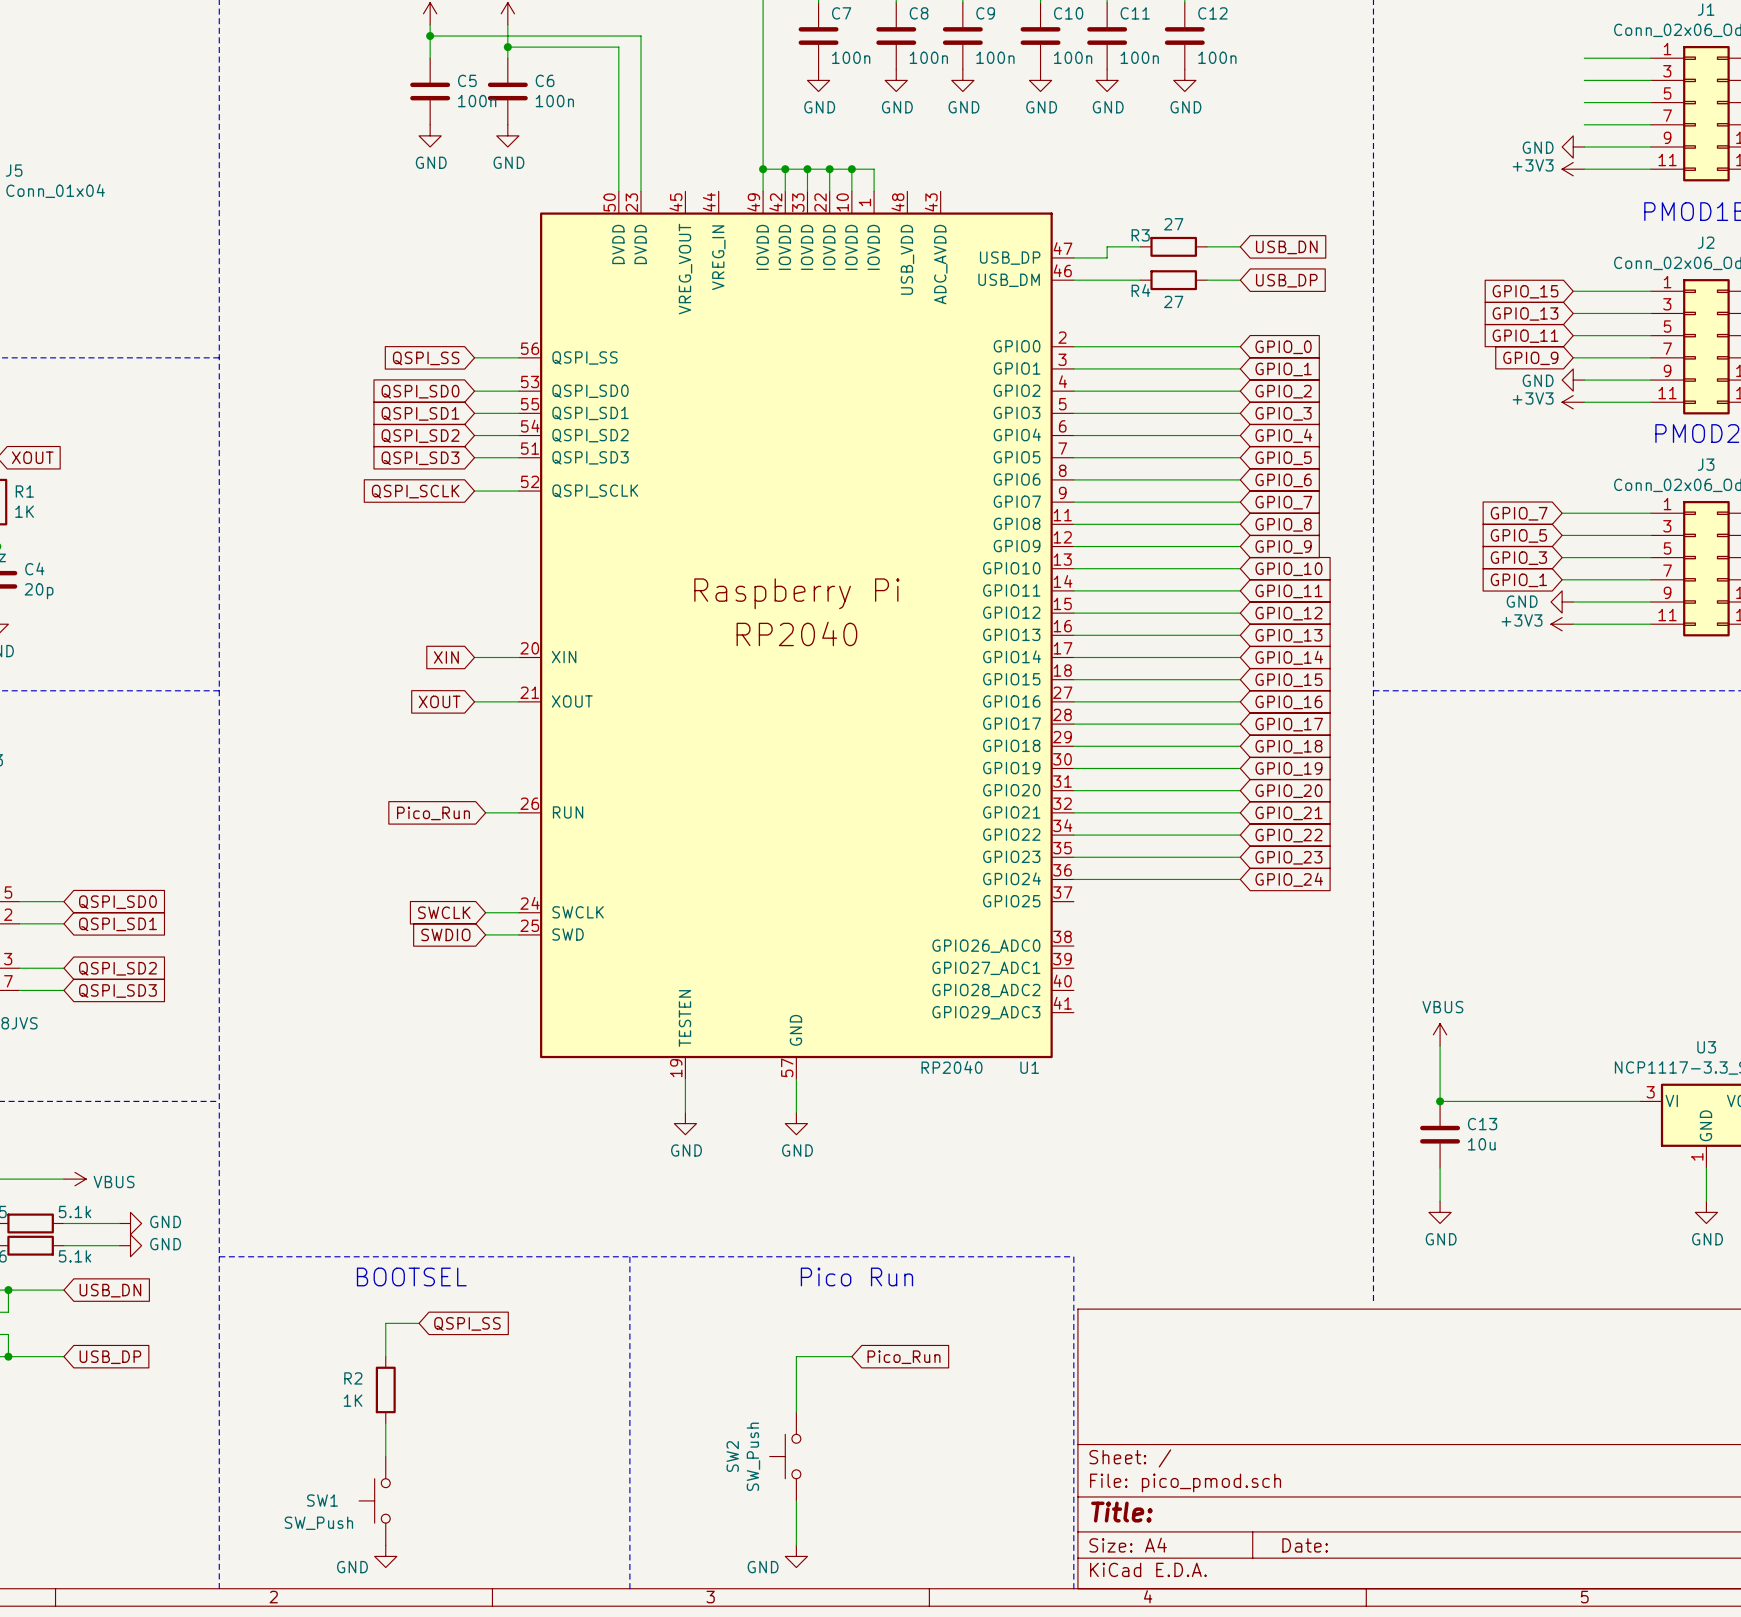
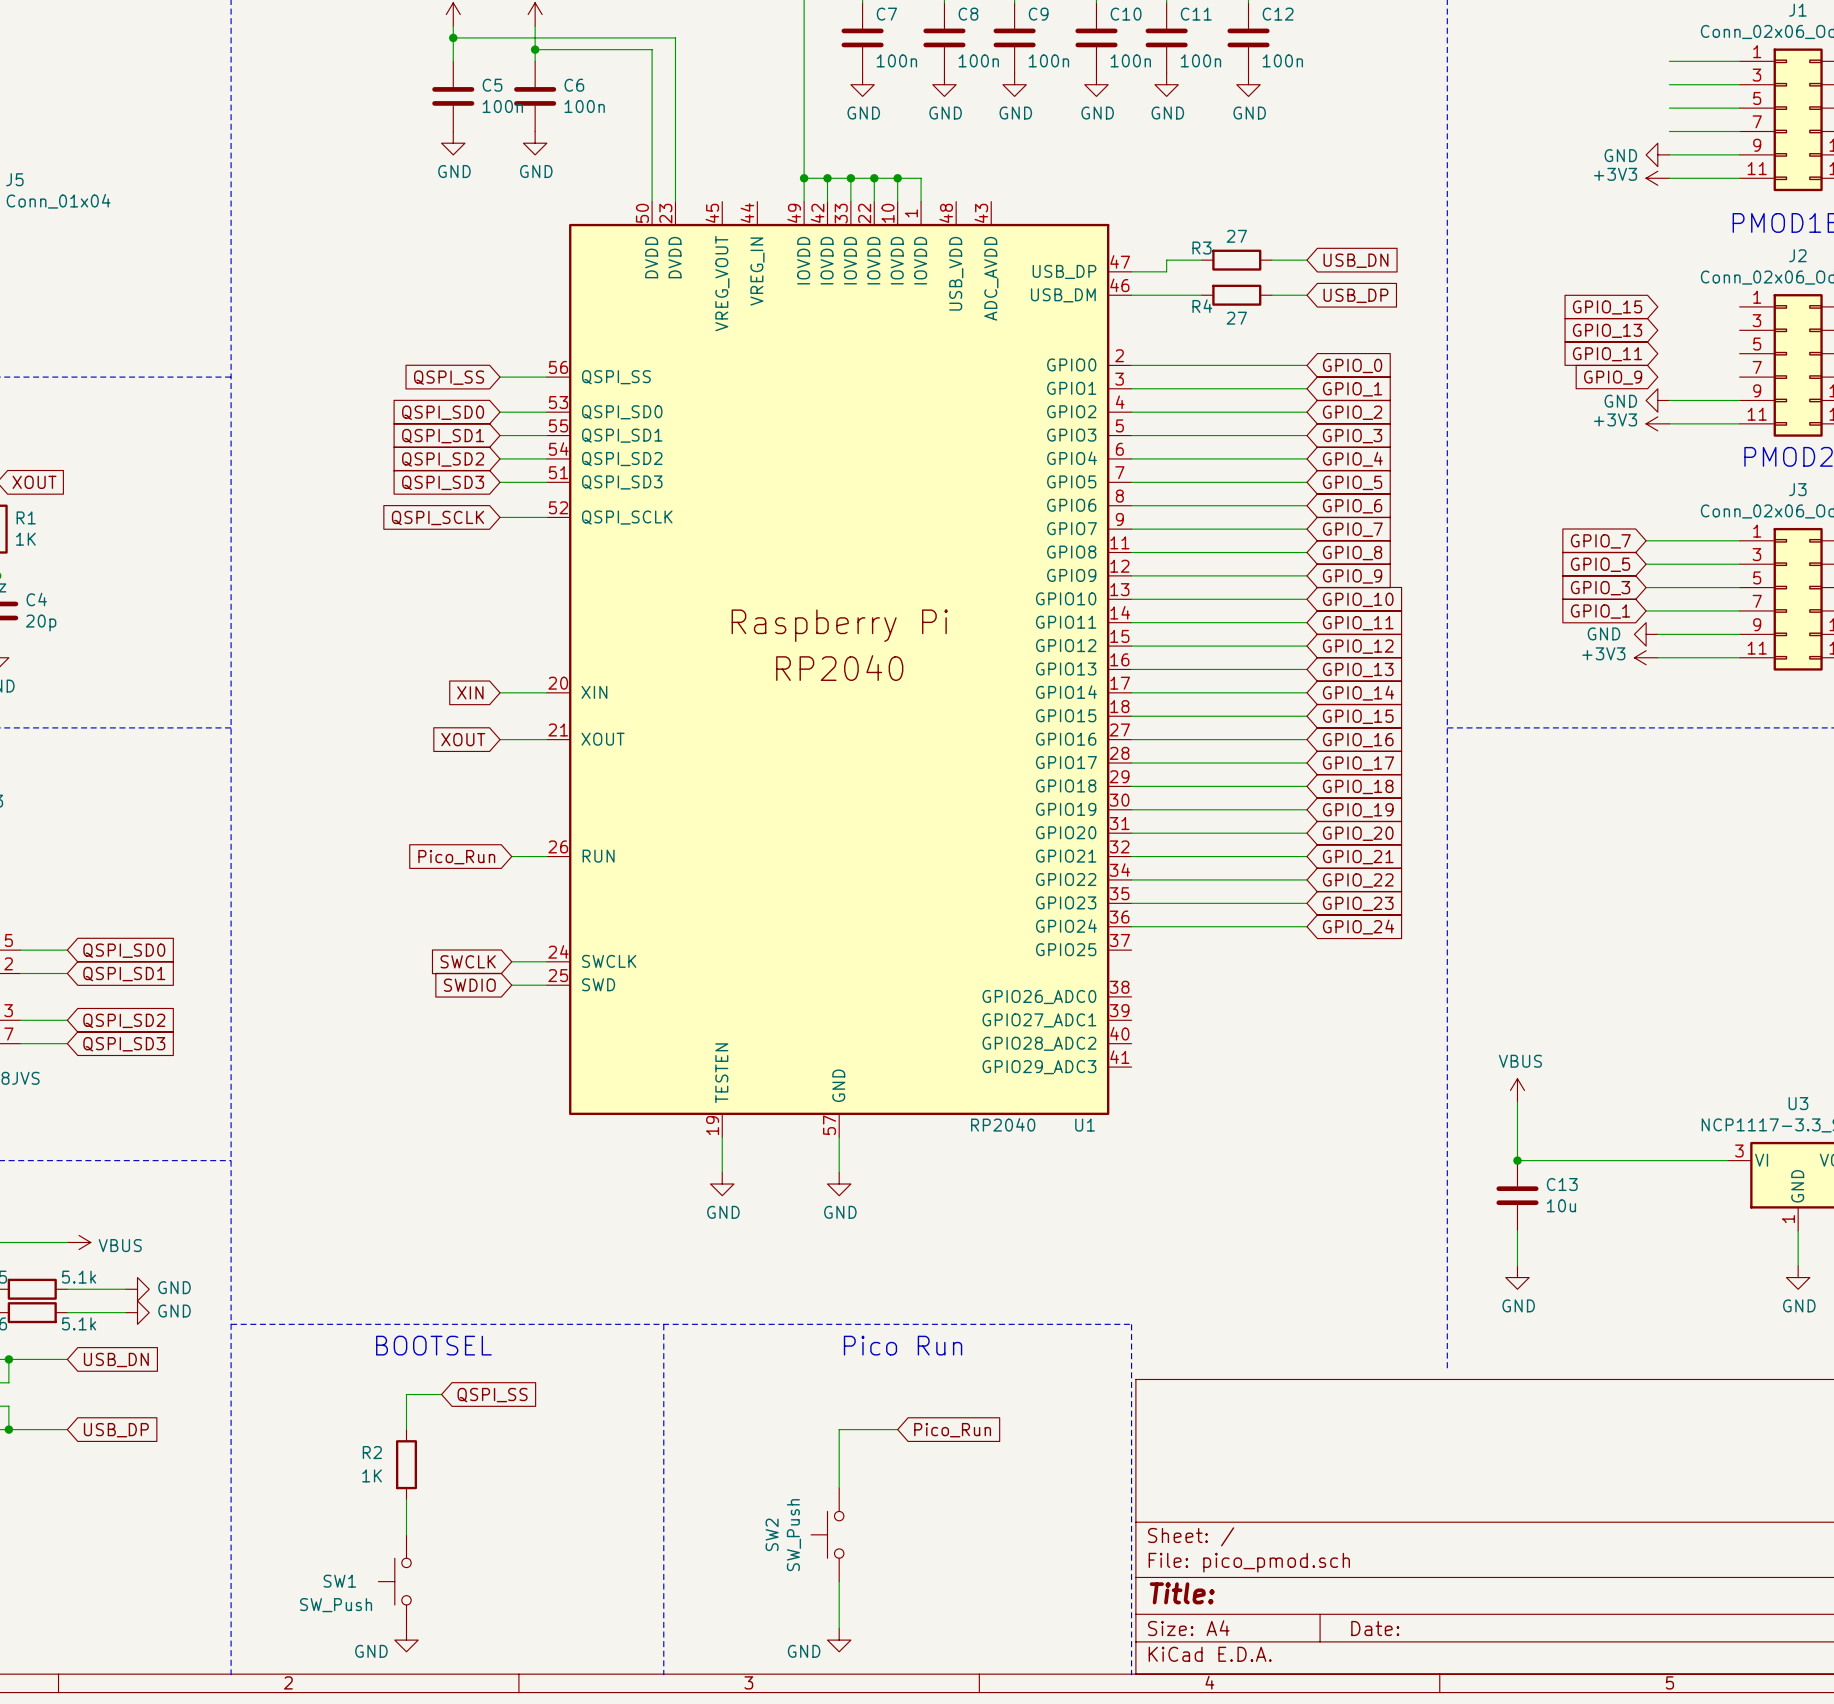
wire: (1573, 291) (1650, 291) -> none
wire: (1573, 313) (1650, 313) -> none
wire: (1573, 335) (1650, 335) -> none
wire: (1573, 357) (1650, 357) -> none

